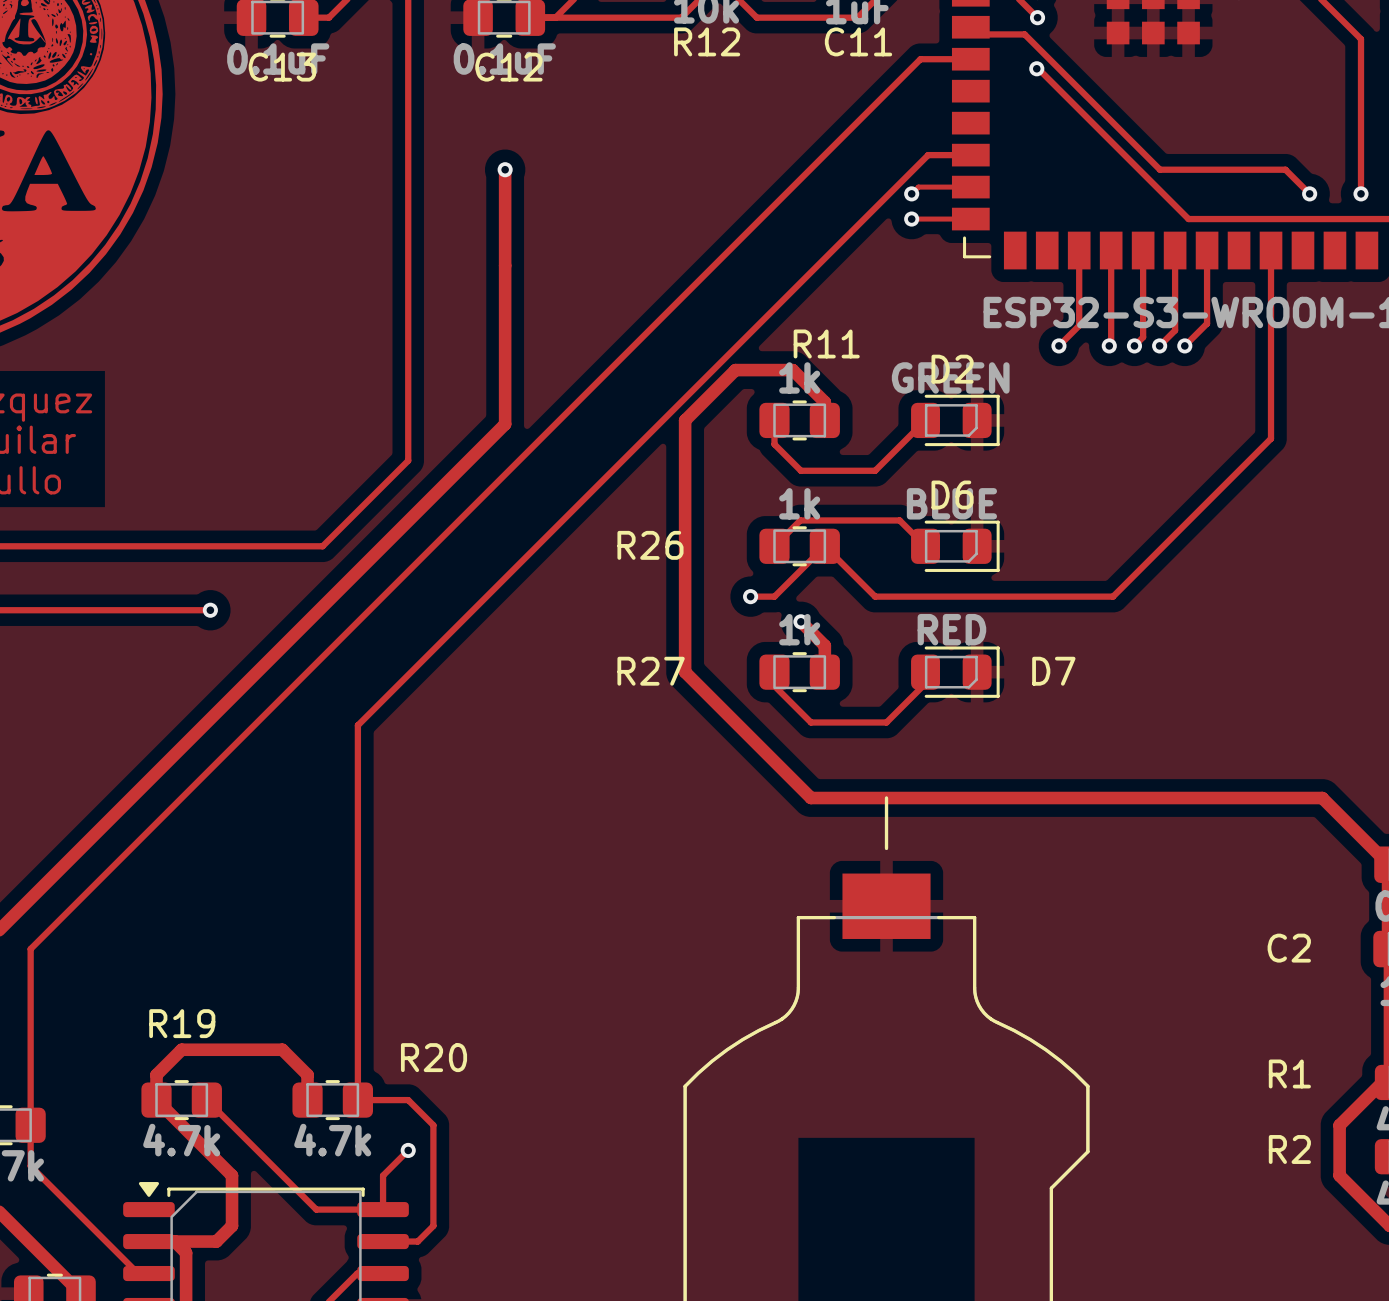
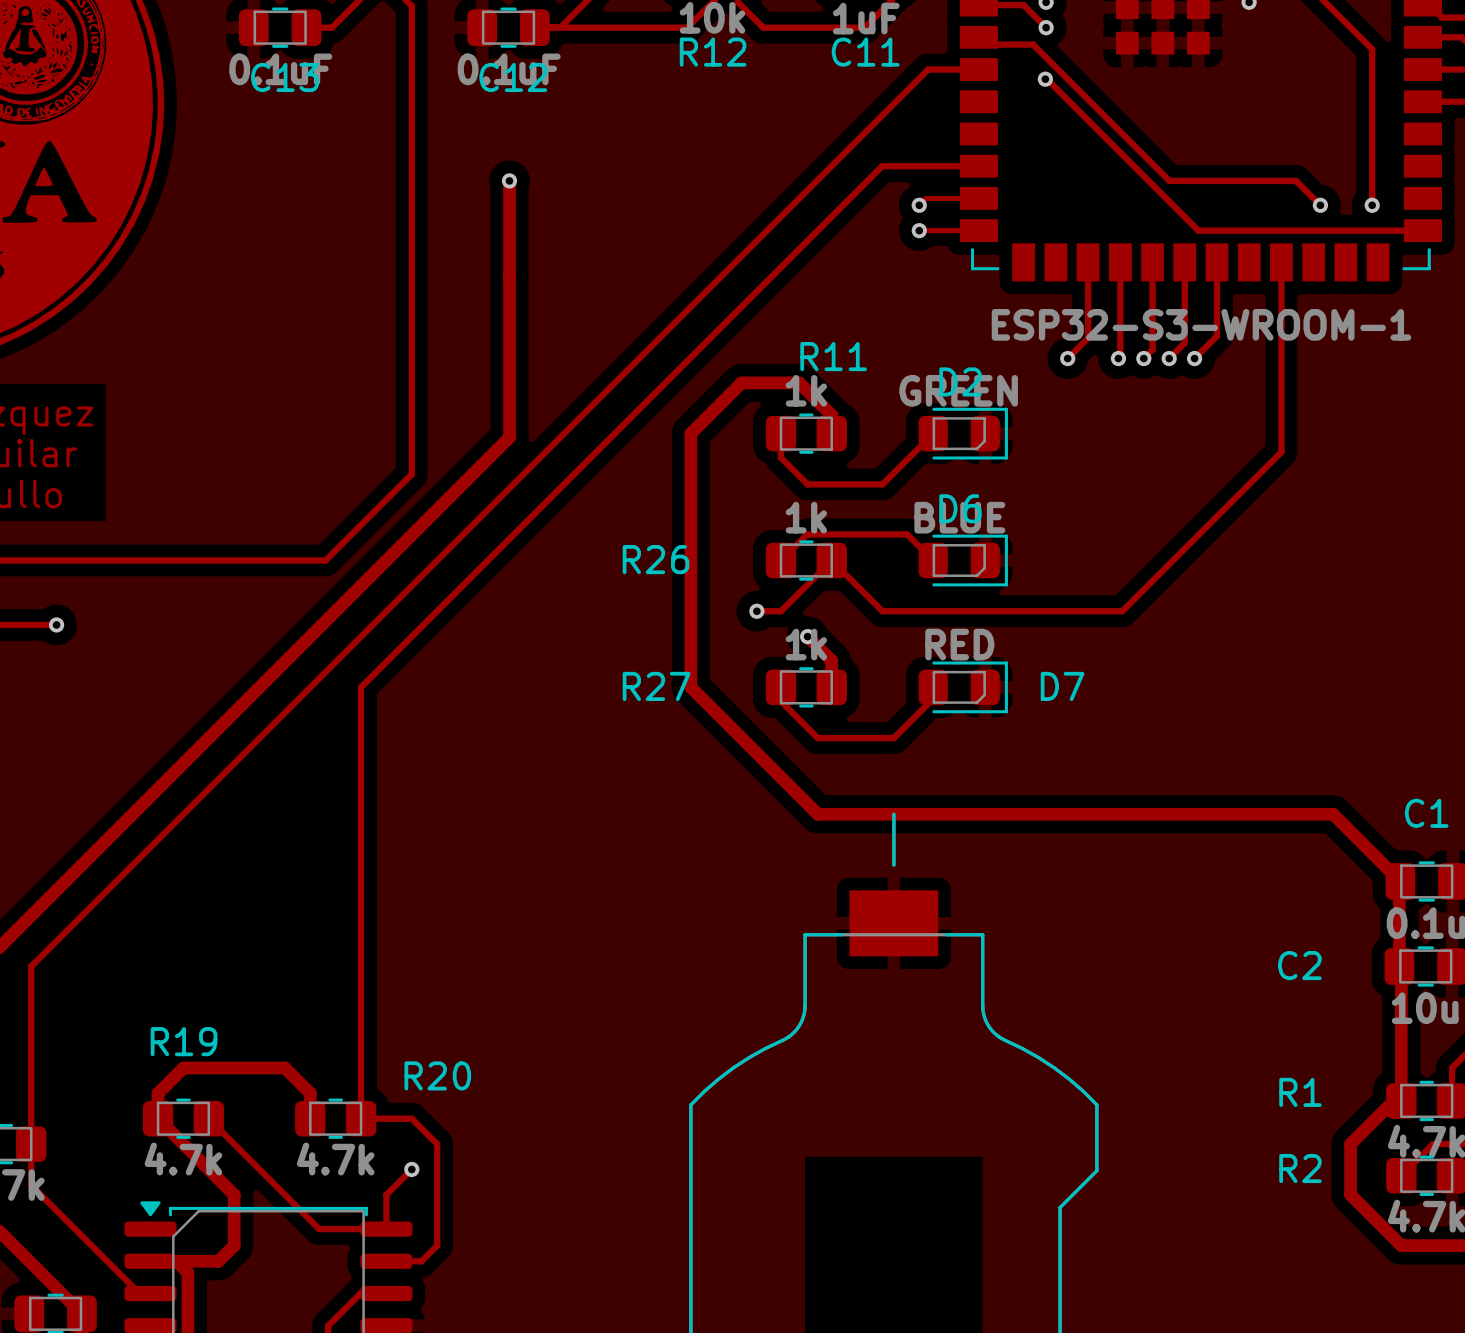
track: (928, 155) (357, 725) -> (935, 166) (882, 166) (361, 687) (361, 741)
track: (55, 610) (210, 610) -> none
via: none -> (56, 624)
via: (210, 610) -> none

